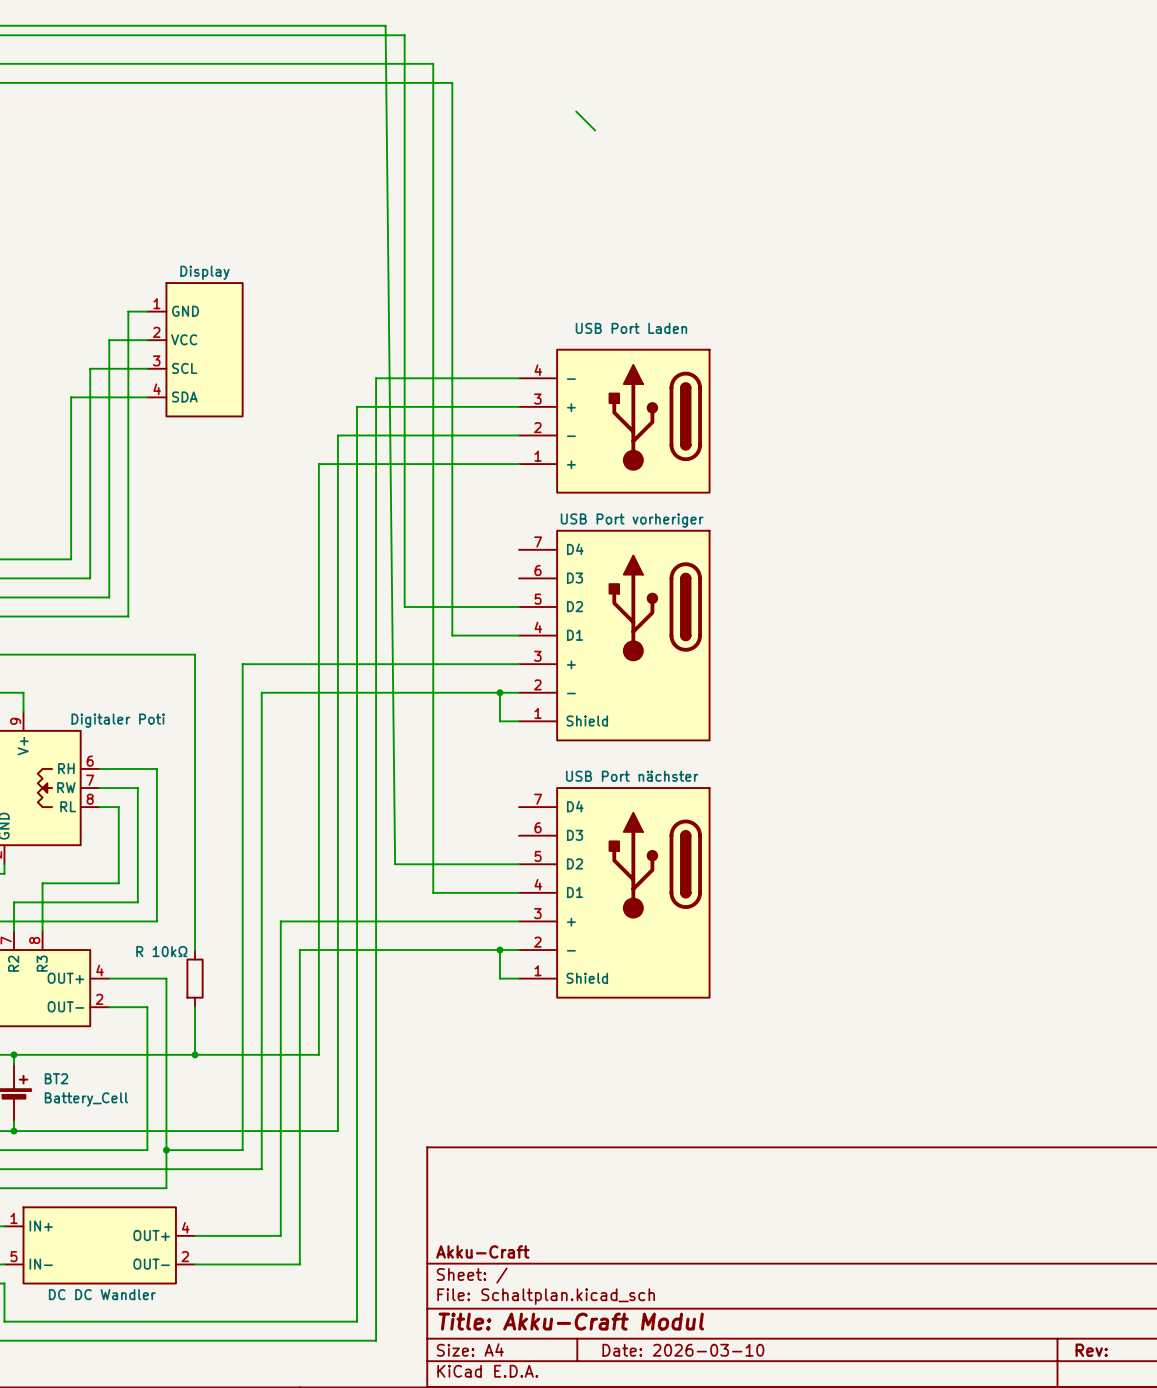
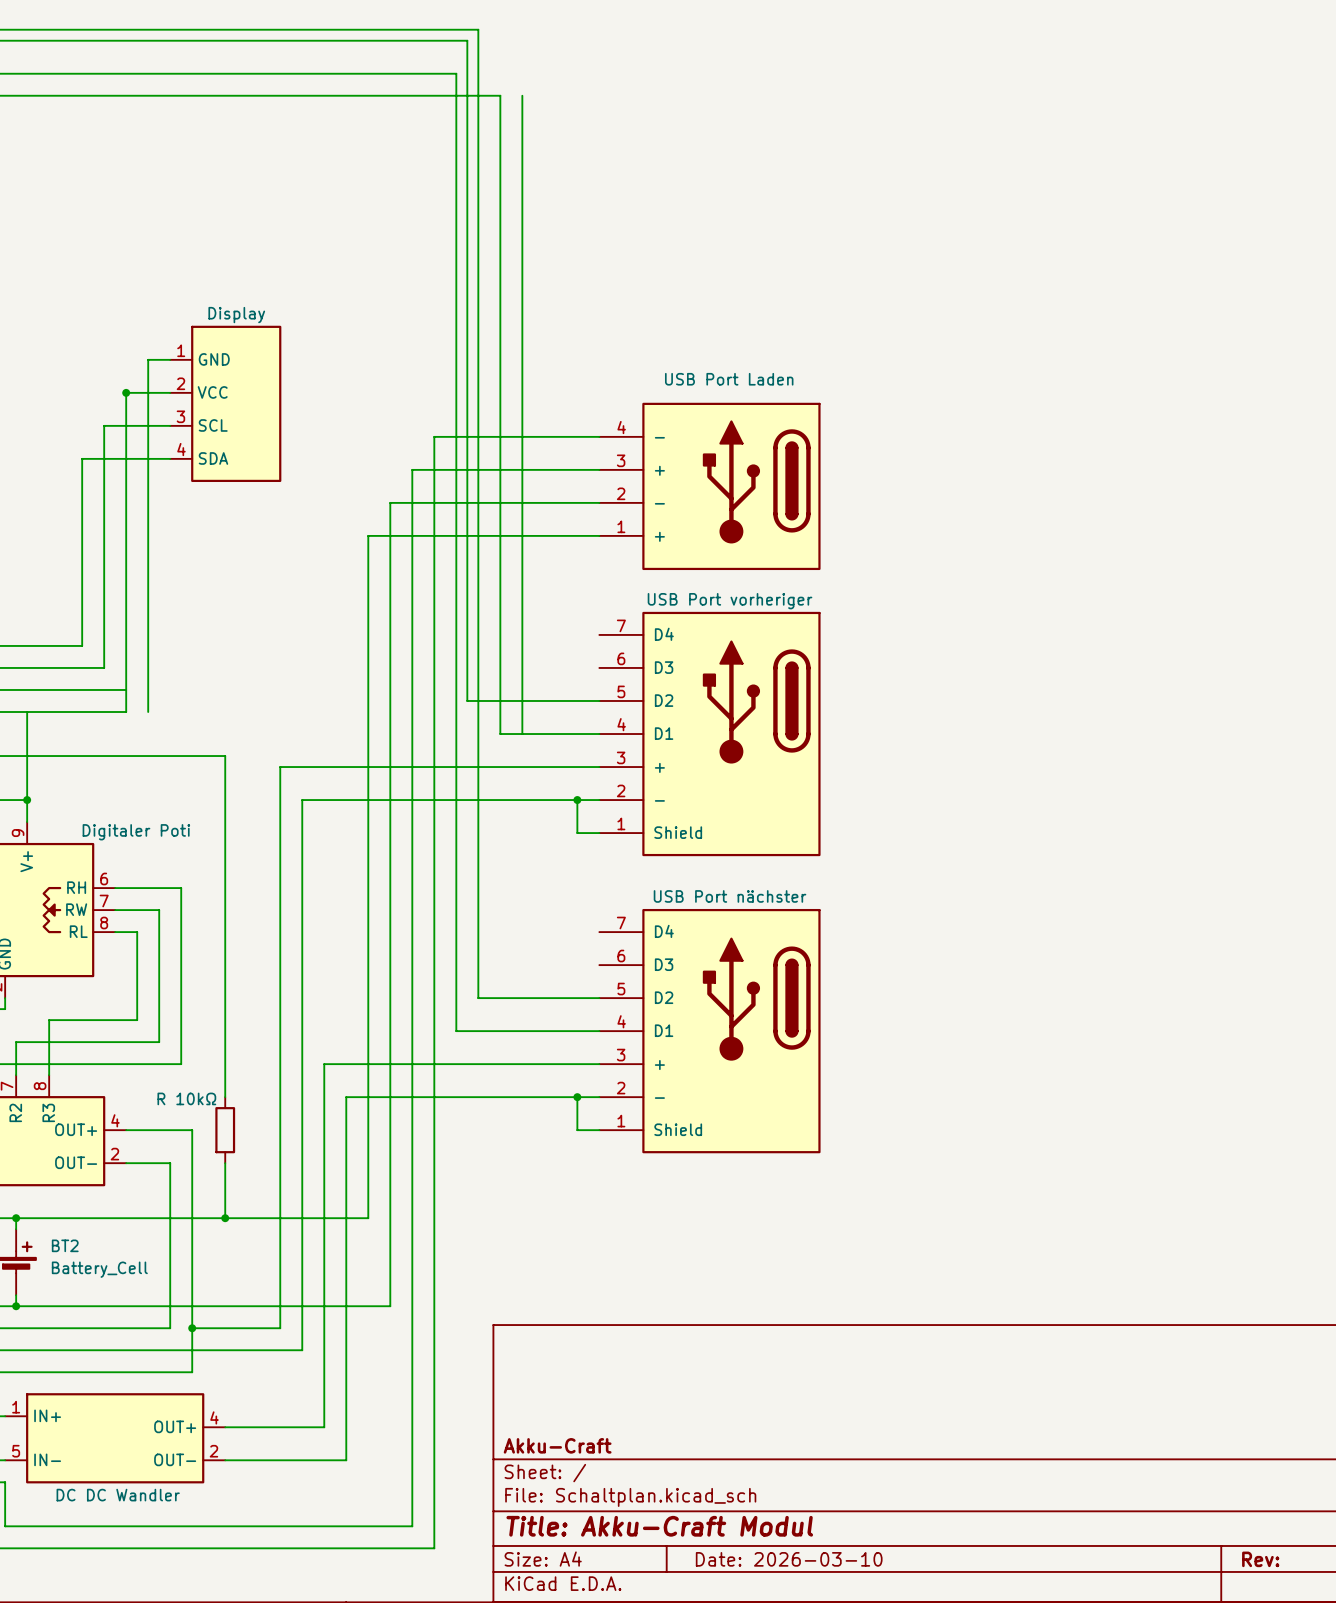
wire: (385, 25) (395, 864) (414, 864) -> (445, 29) (478, 29) (478, 998)
wire: (395, 63) (433, 63) (433, 82) (452, 82) -> (456, 73) (456, 1031) (500, 1031)
wire: (576, 111) (595, 130) -> none
junction: none -> (126, 392)
wire: none -> (27, 711) (27, 800)
wire: (109, 616) (128, 616) -> (126, 711) (126, 689)
wire: (433, 635) (433, 892) -> (500, 734) (522, 734)
junction: none -> (27, 800)

